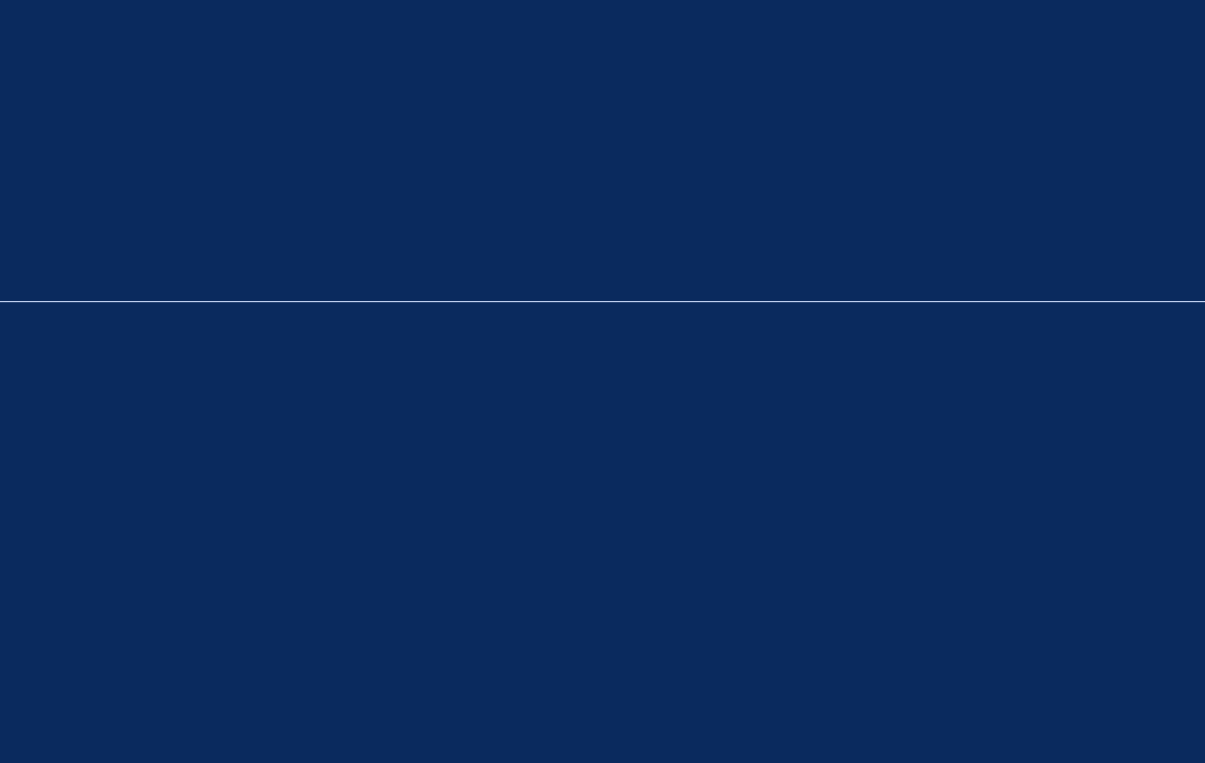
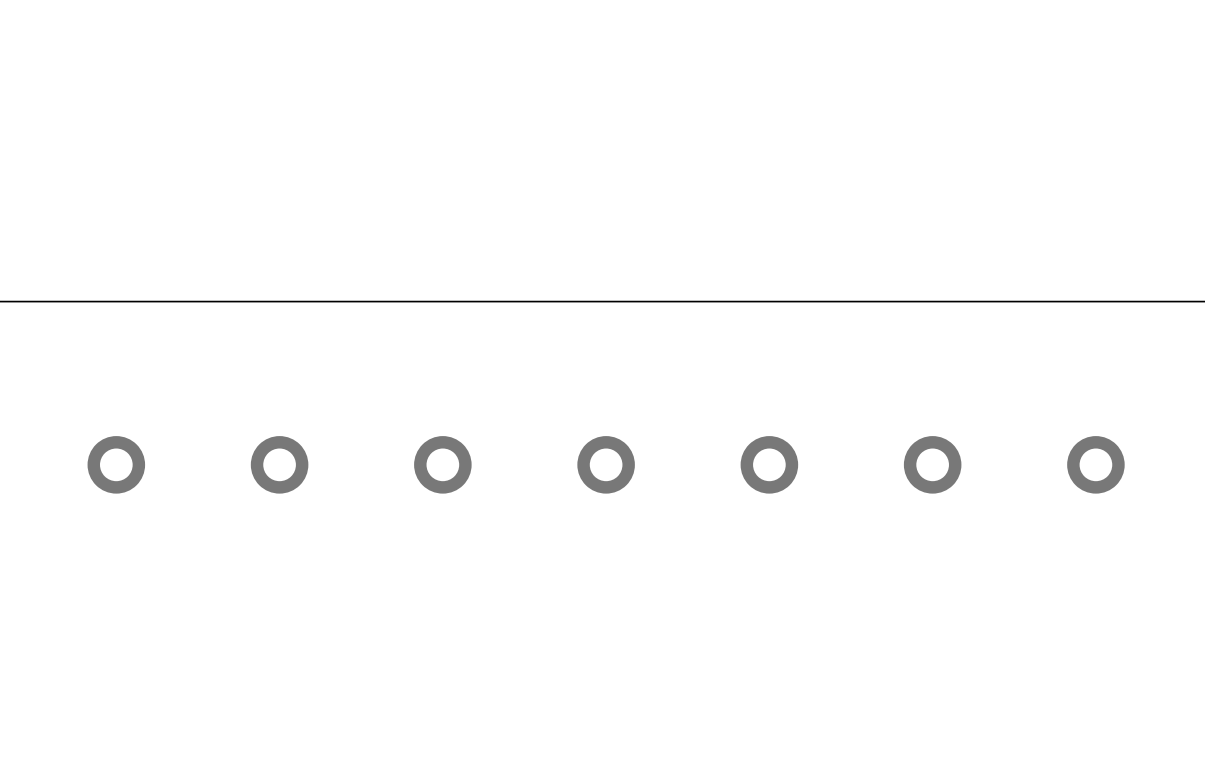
via: none -> (116, 464)
via: none -> (279, 464)
via: none -> (442, 464)
via: none -> (606, 464)
via: none -> (769, 464)
via: none -> (932, 464)
via: none -> (1095, 464)

